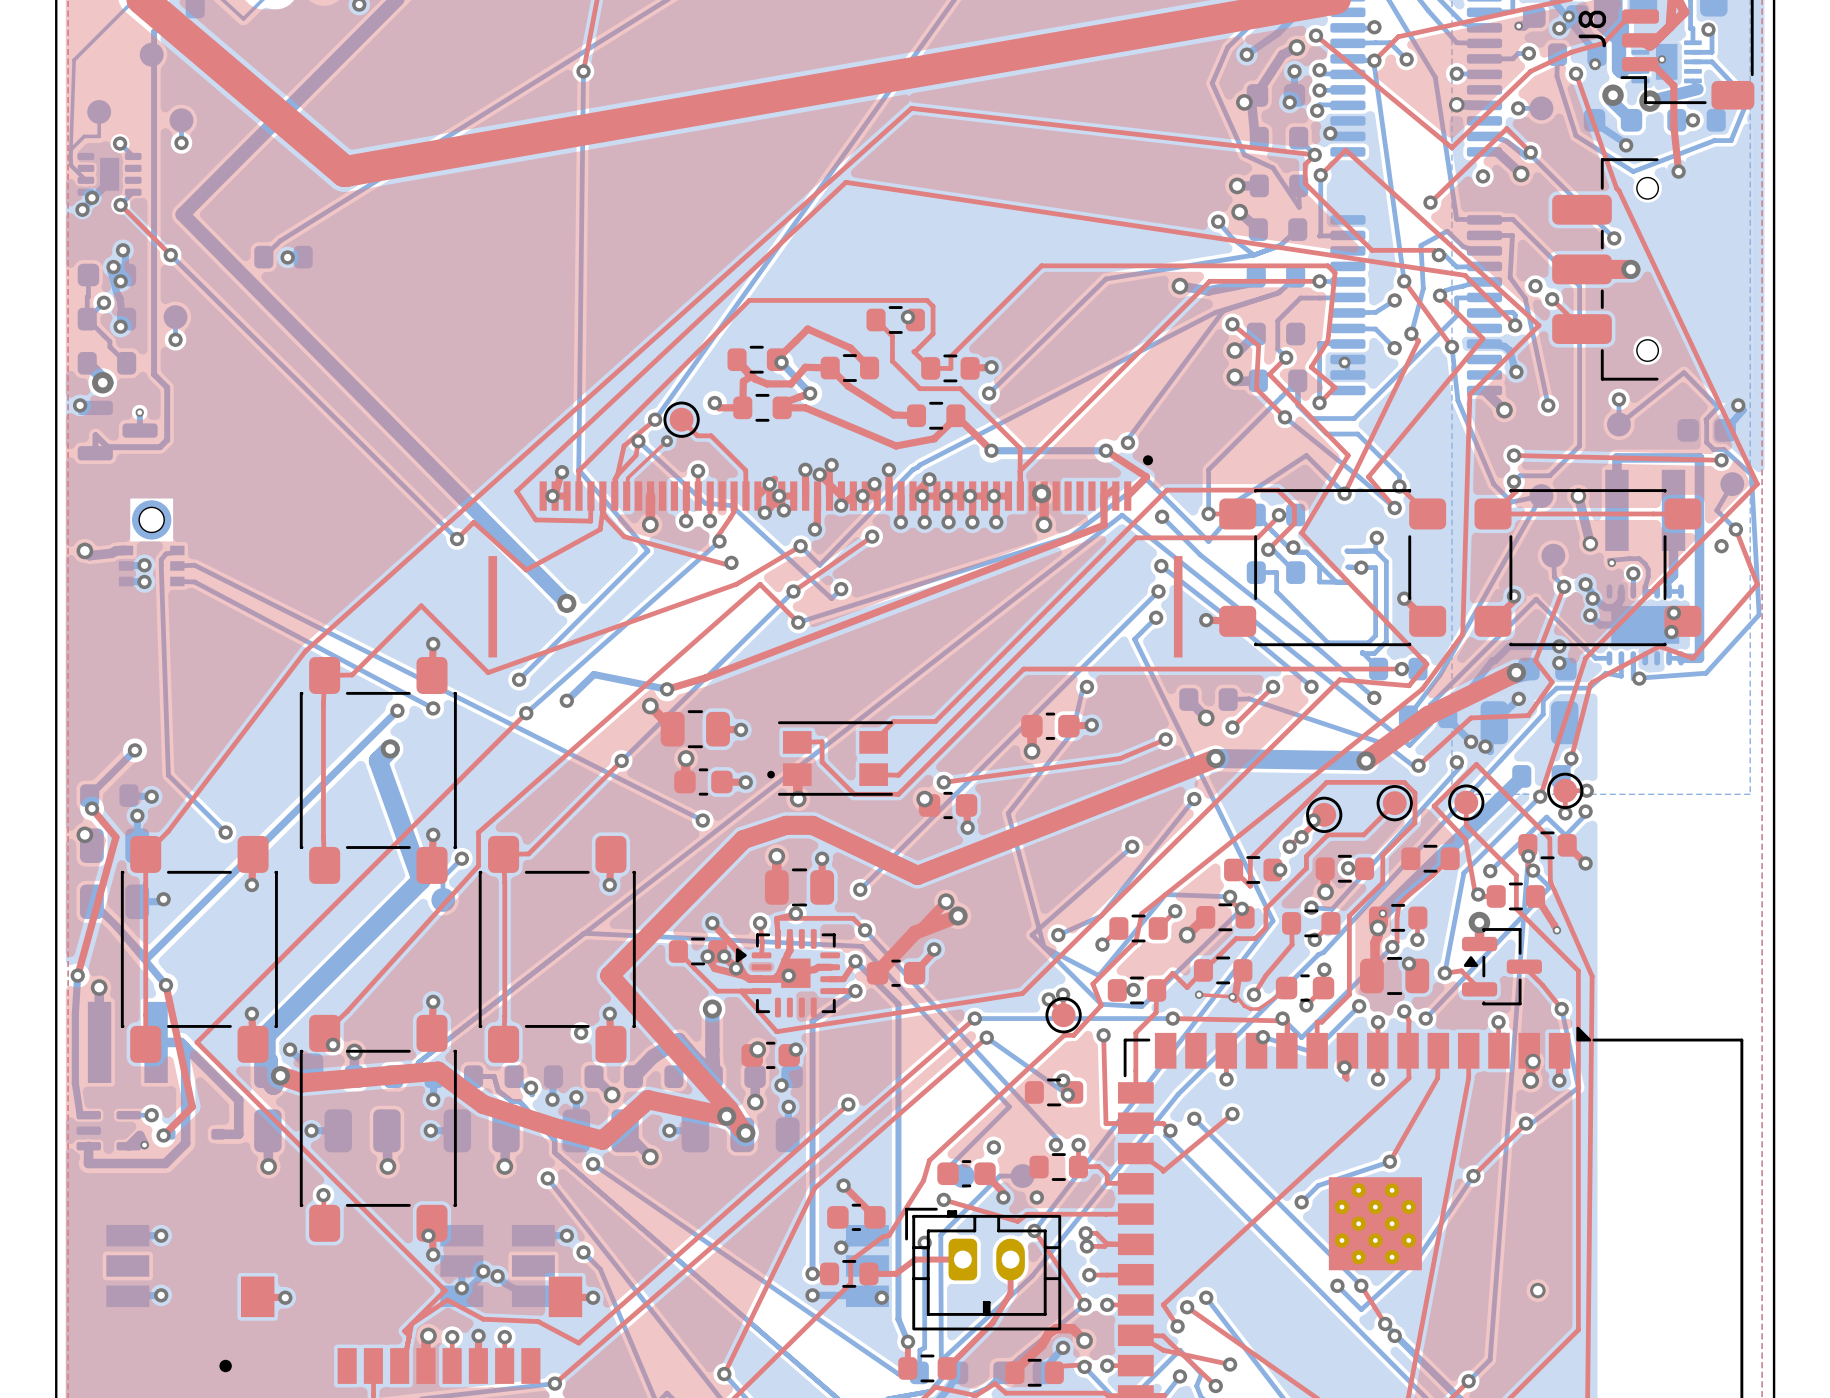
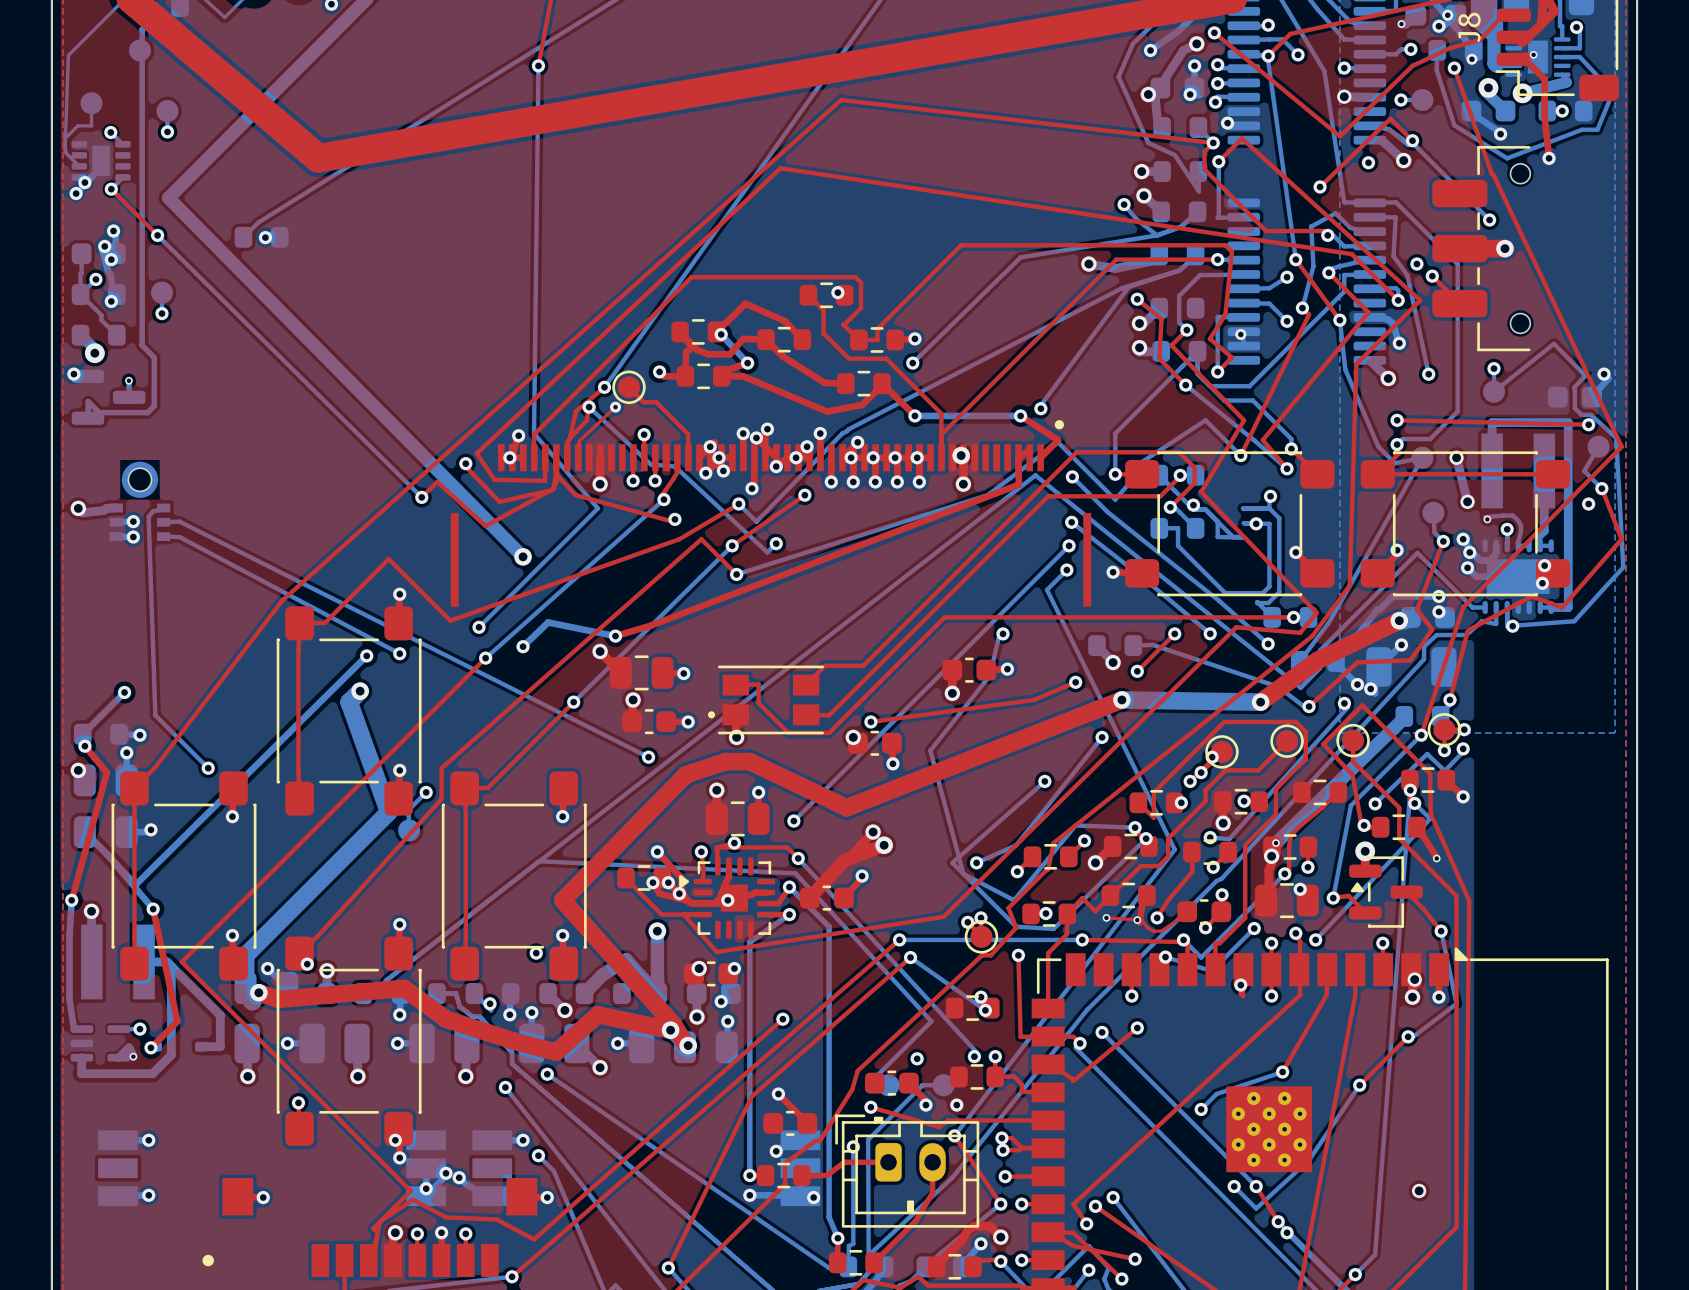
top track: none -> (556, 457) (556, 481) (552, 490) (499, 501) (464, 465) (465, 463)
via: none -> (465, 463)

